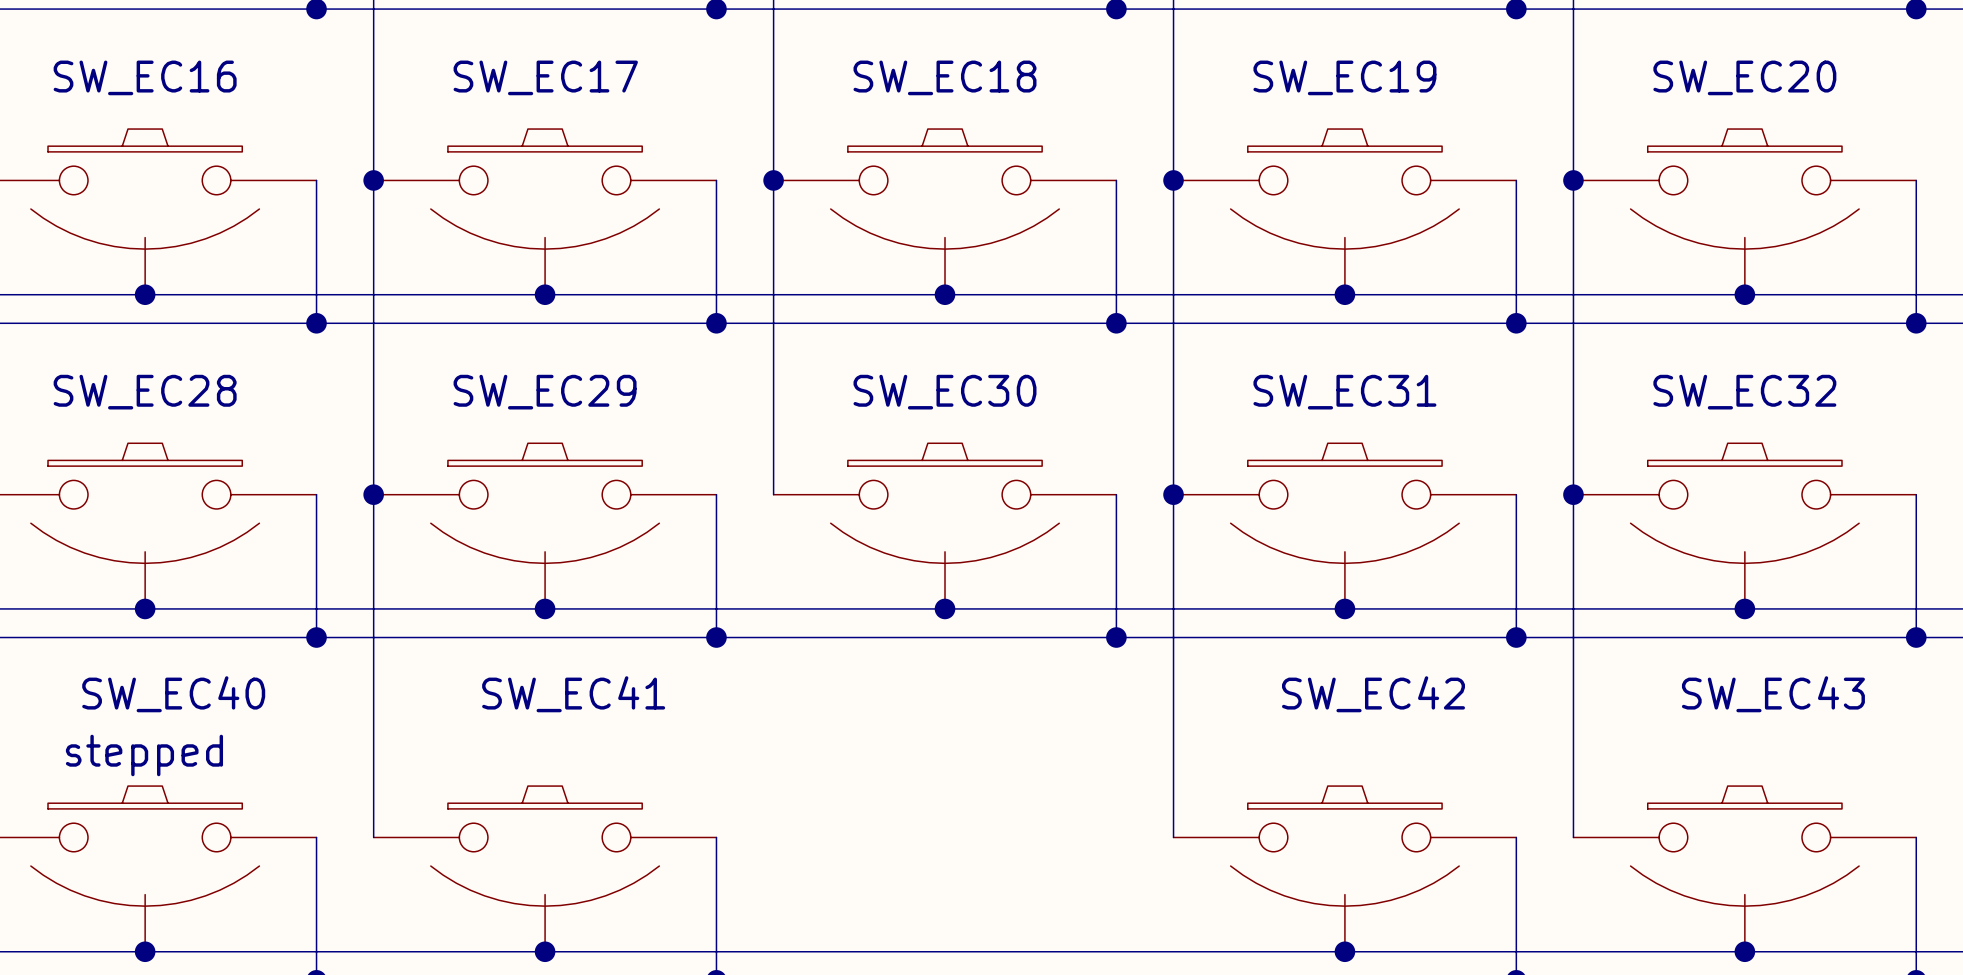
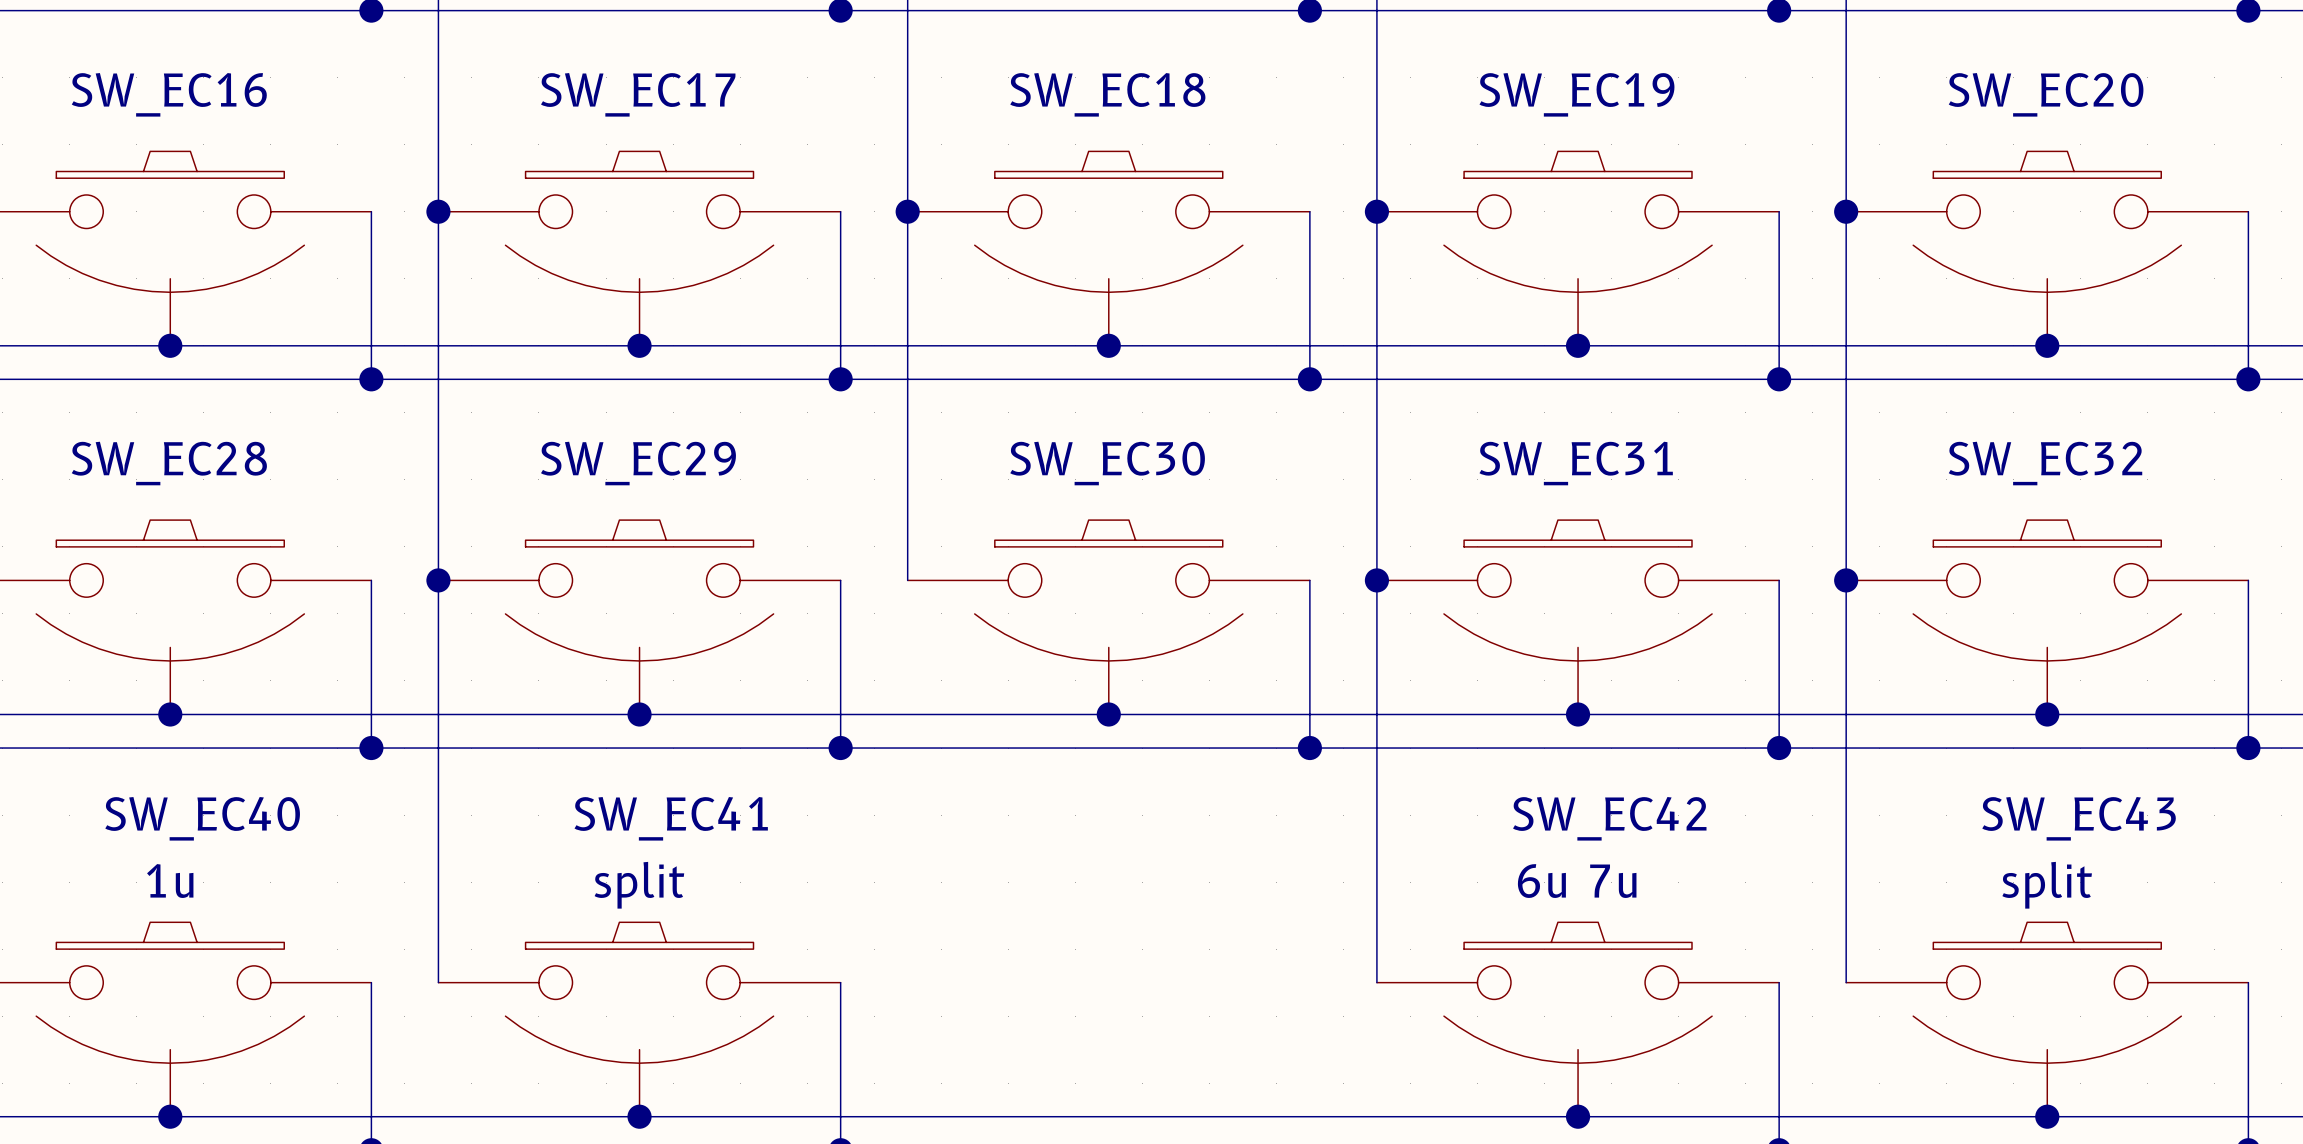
SW_EC42 value: none -> 6u 7u (1577, 881)
SW_EC40 value: stepped (144, 755) -> 1u (170, 881)
SW_EC41 value: none -> split (639, 885)
SW_EC43 value: none -> split (2047, 885)

